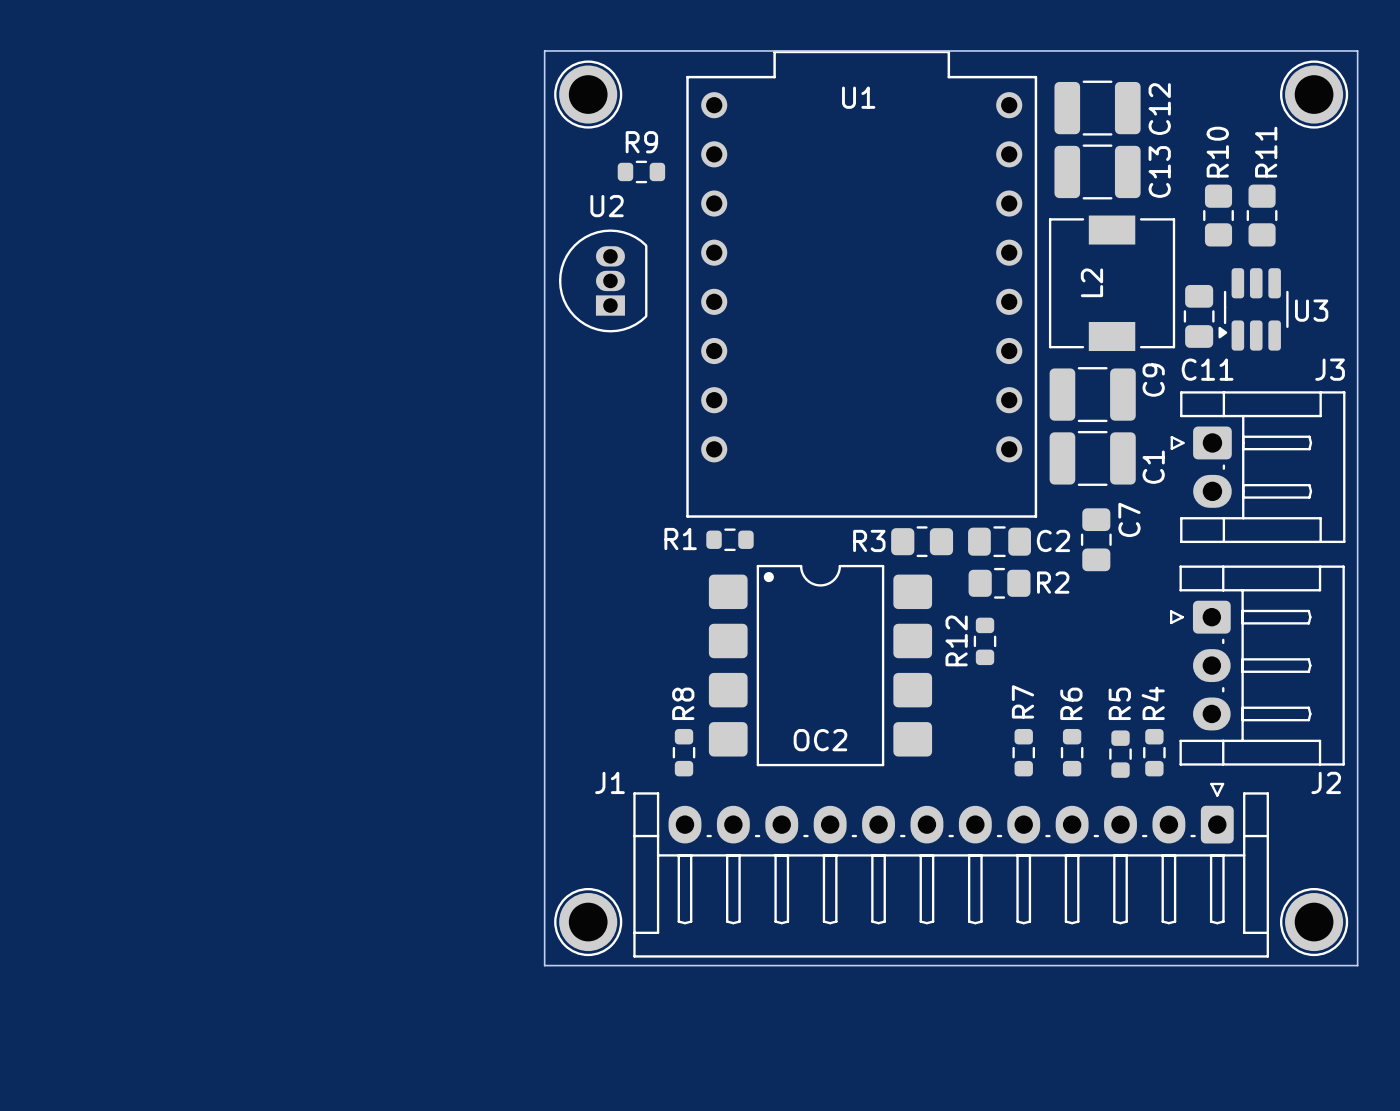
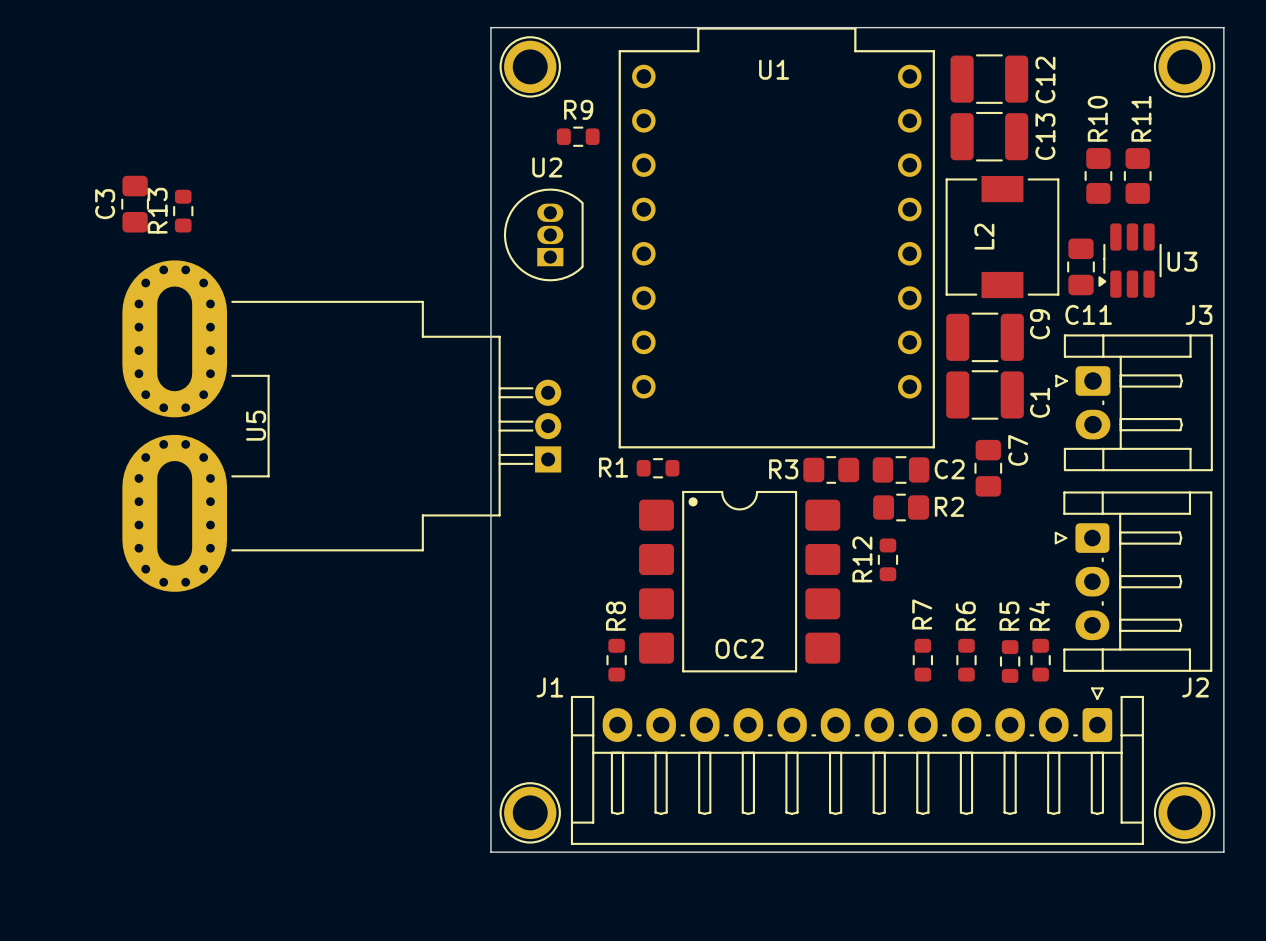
C3: none -> (135, 204)
R13: none -> (183, 211)
U5: none -> (341, 426)

